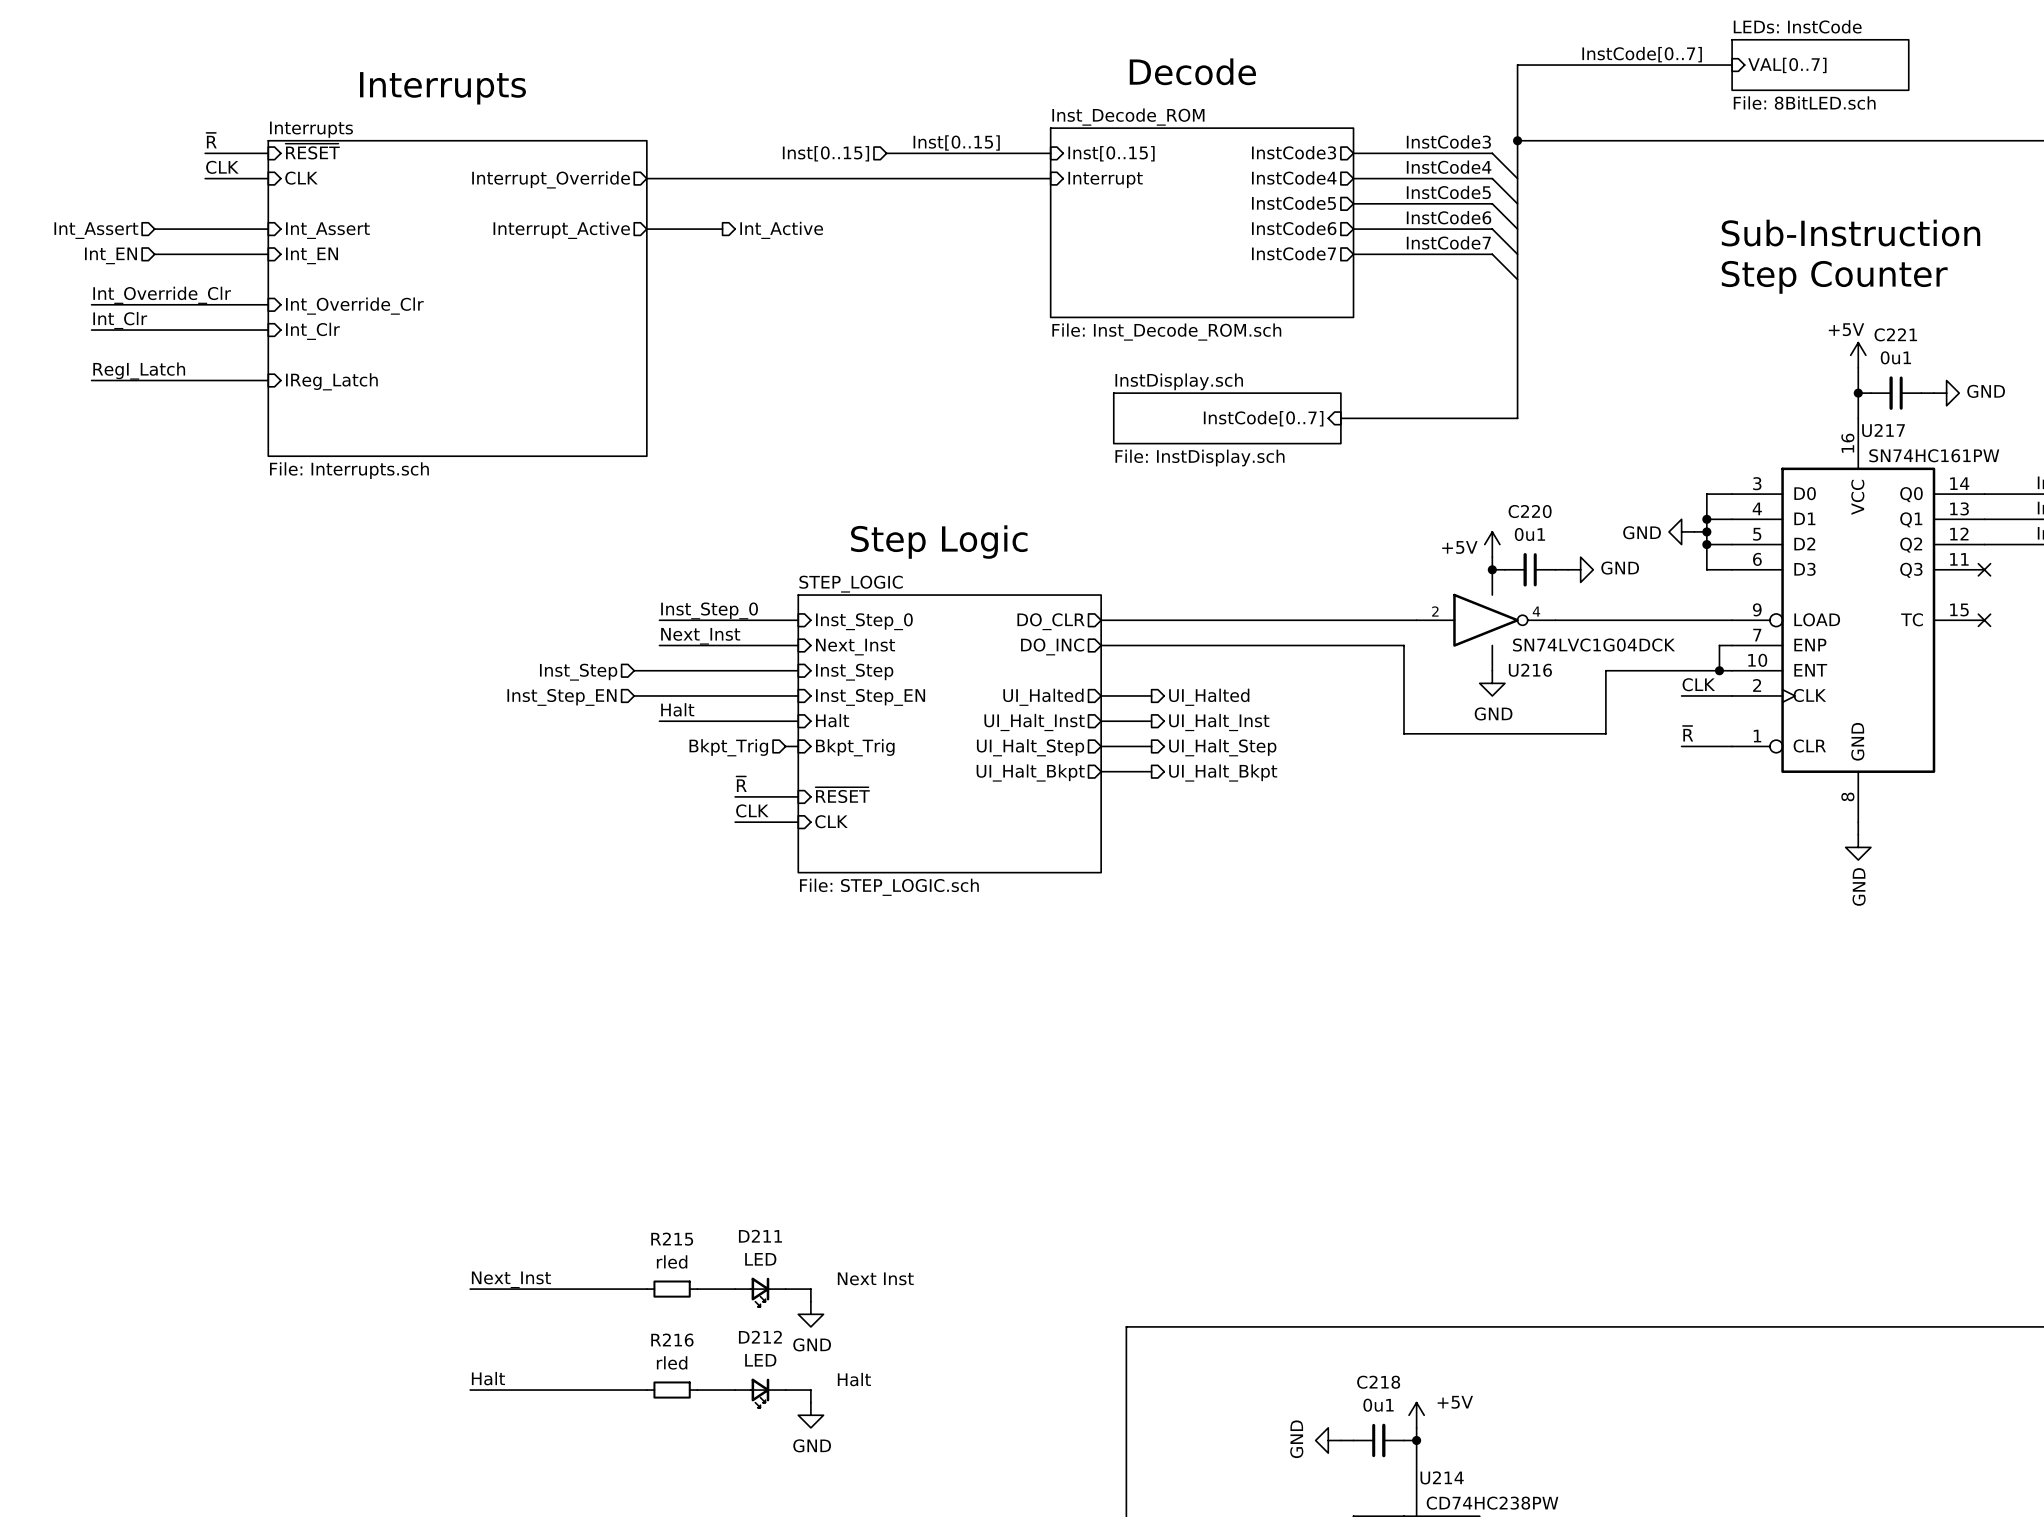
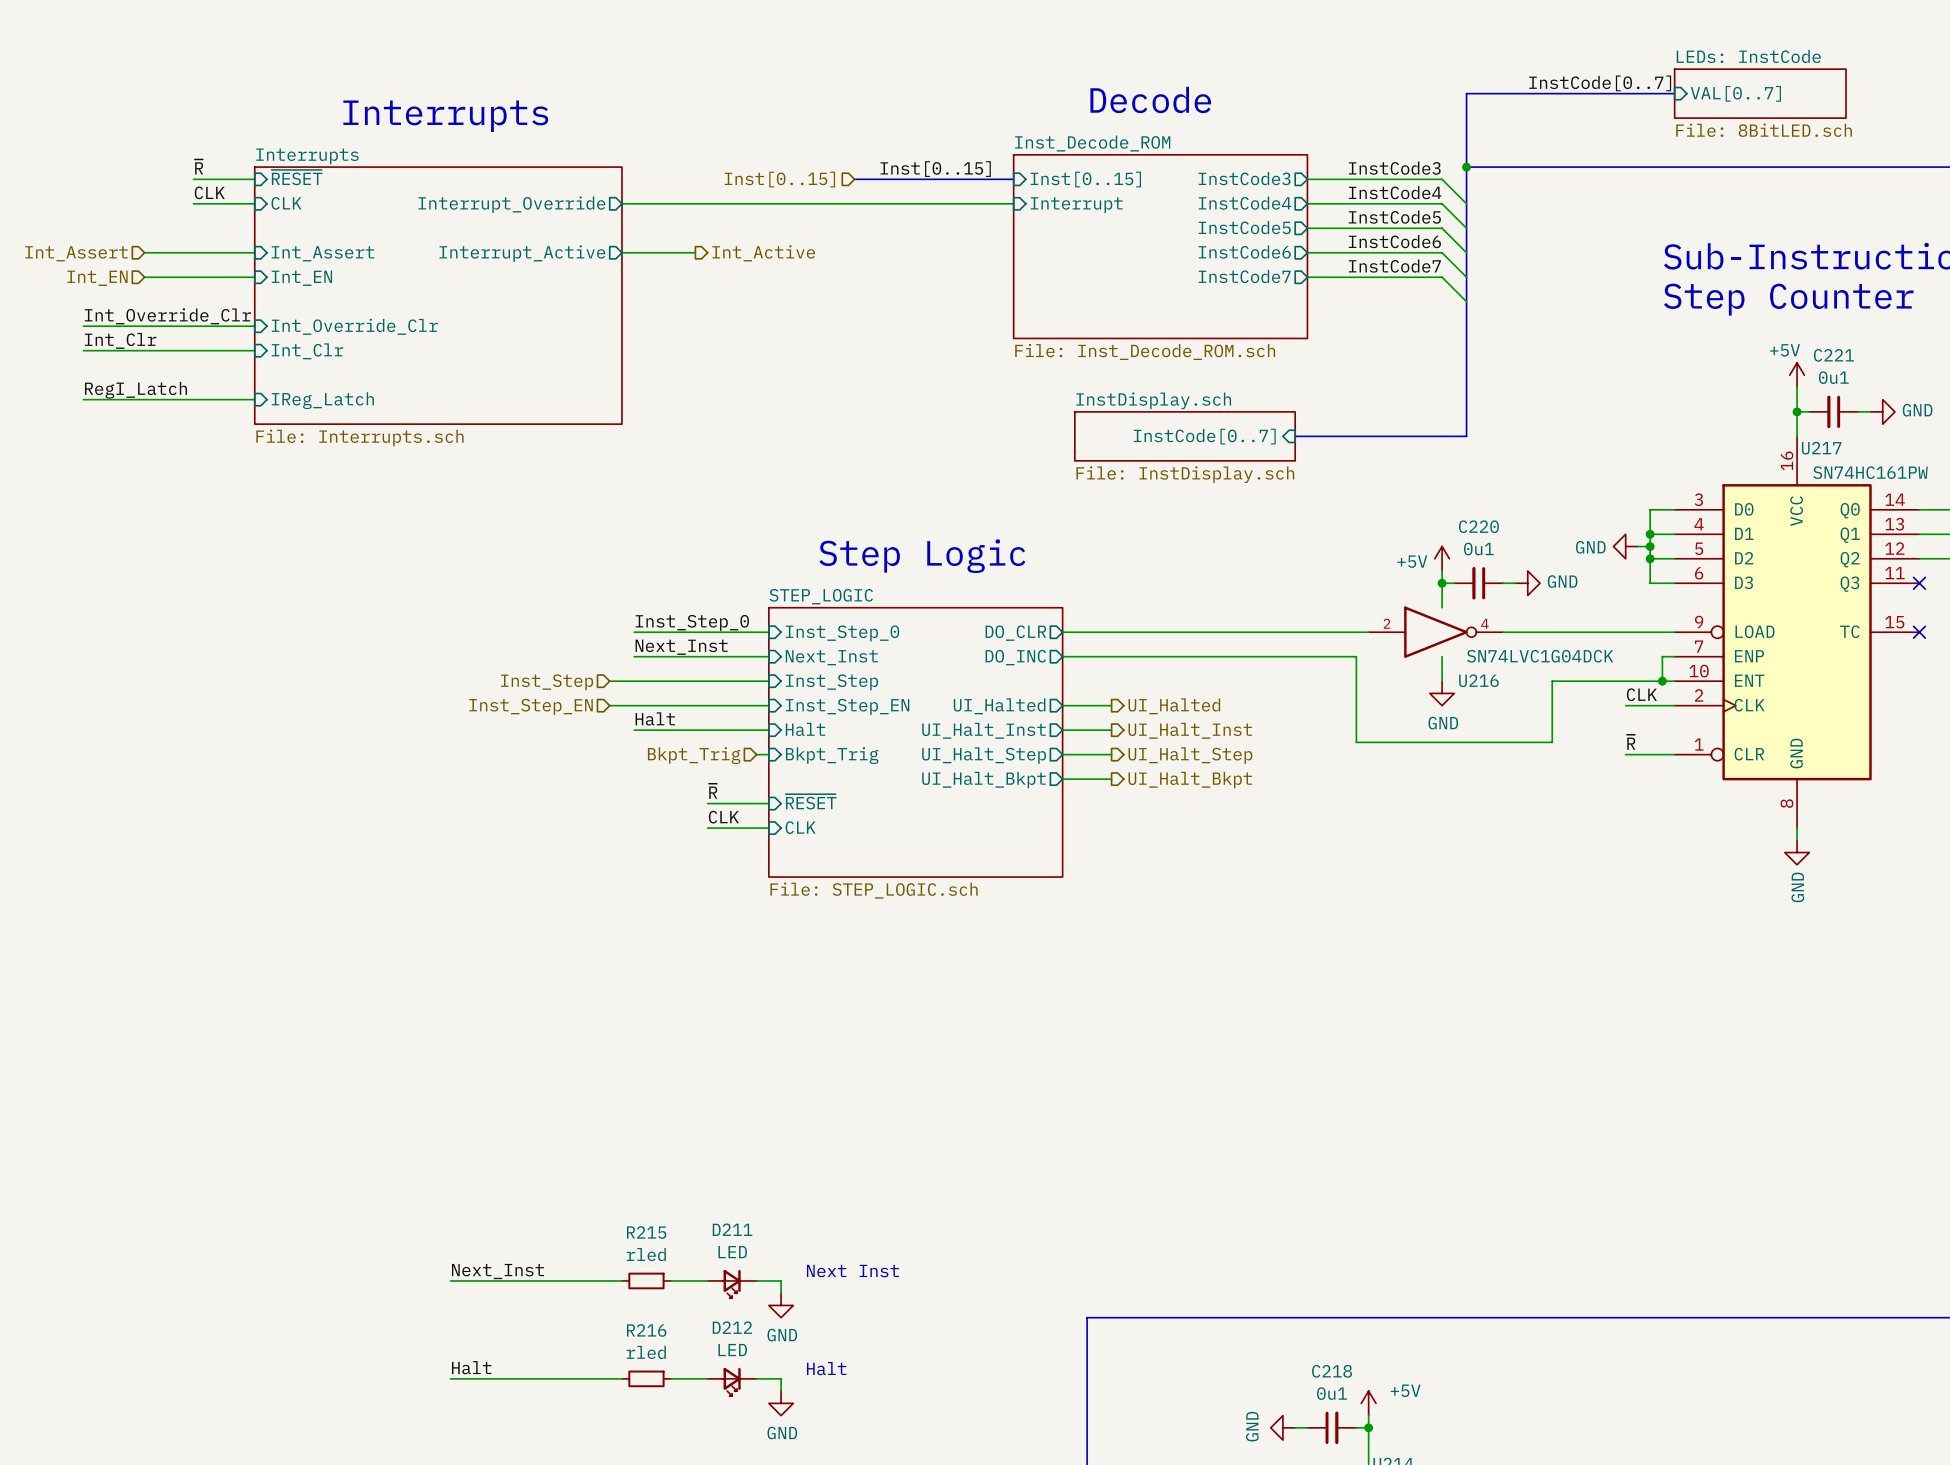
sheet Interrupts: none -> File: Interrupts.sch (438, 295)
sheet Interrupts: File: Interrupts.sch (457, 298) -> none

